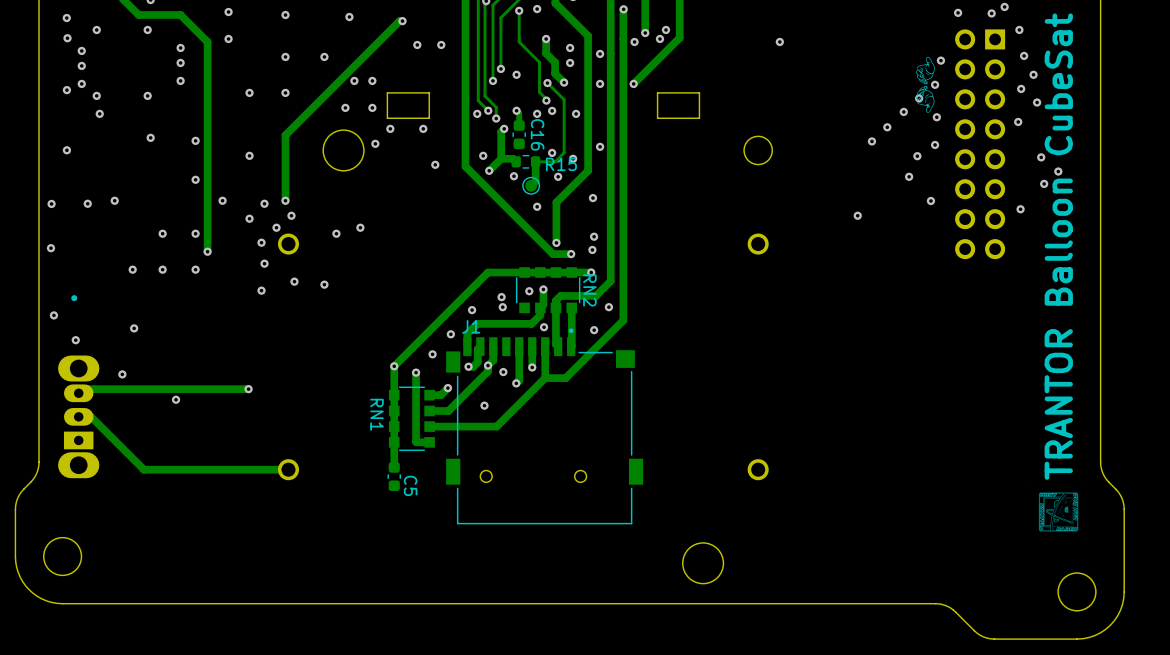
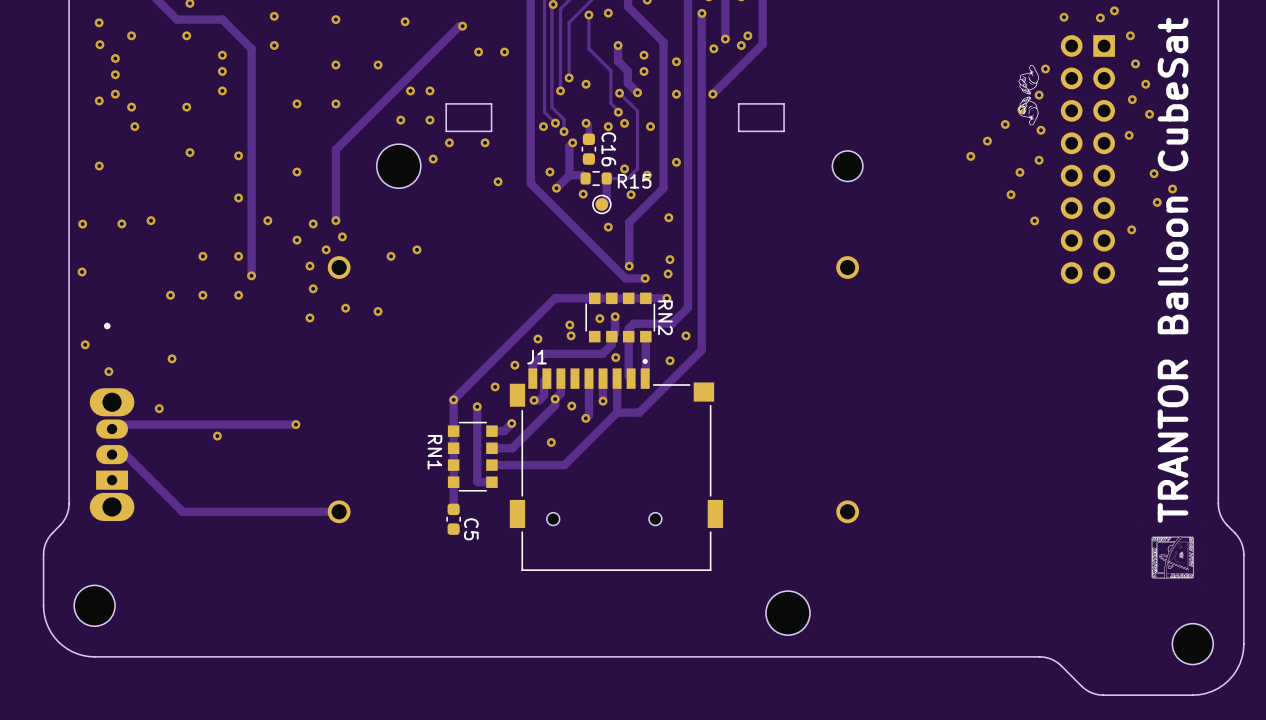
via: (779, 41) -> none
via: (857, 215) -> none

